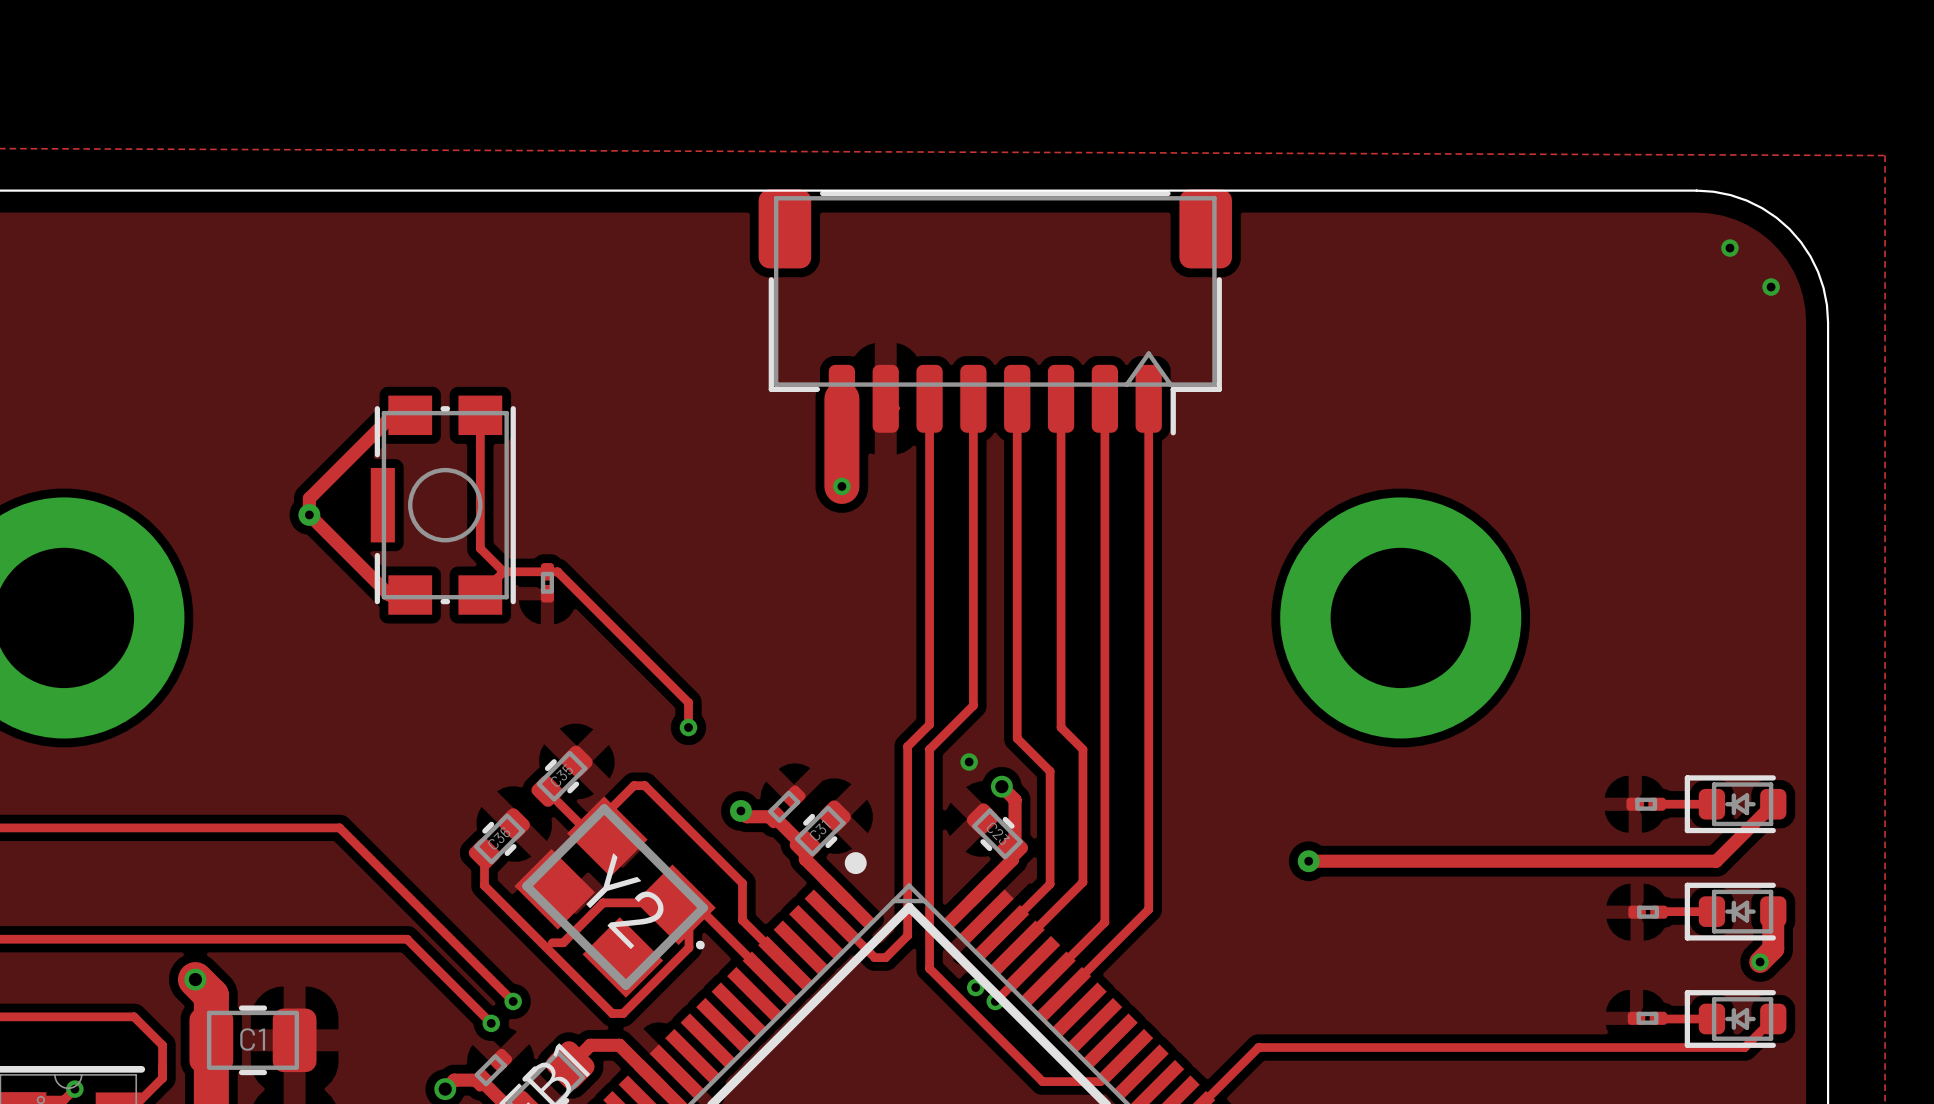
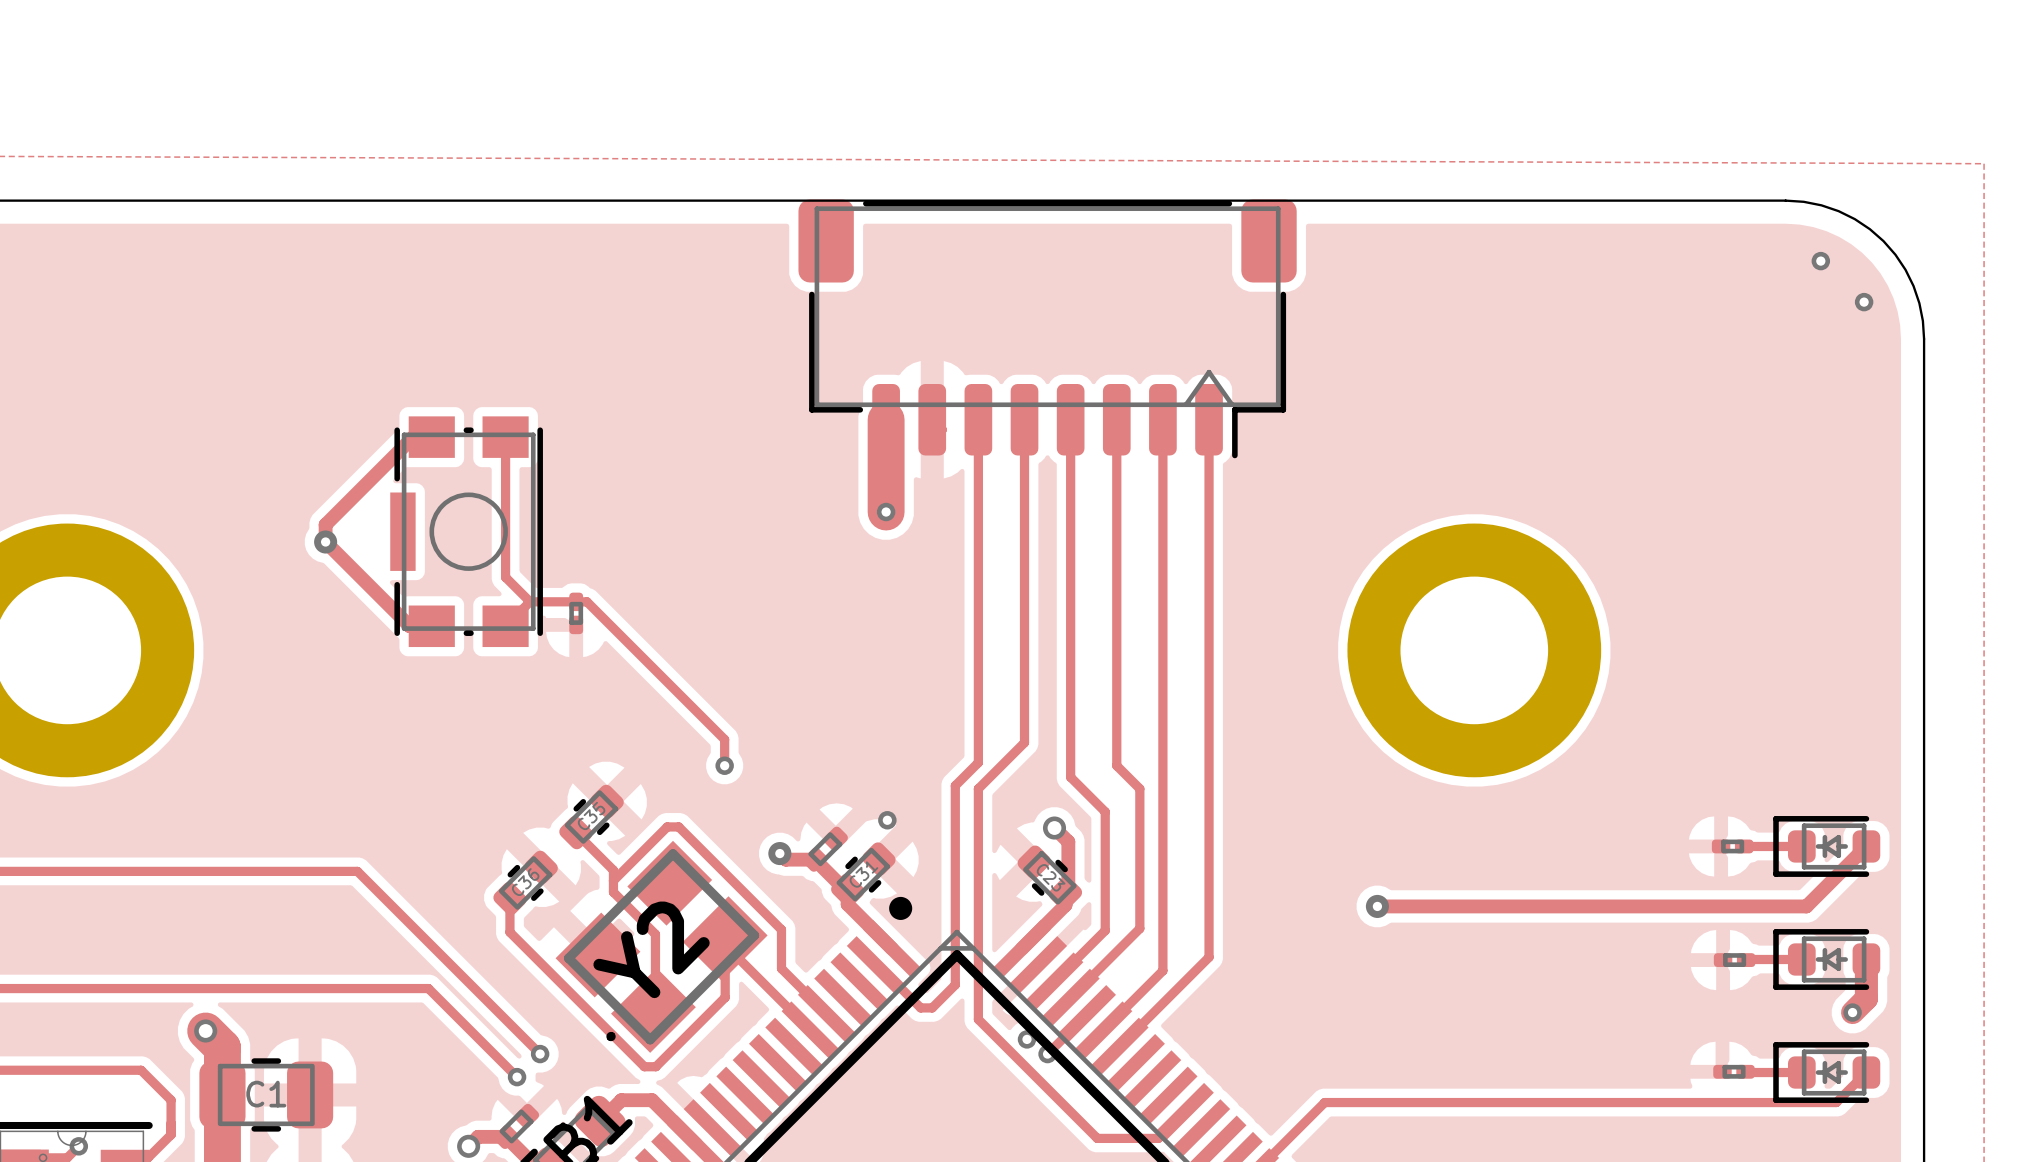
via position: (969, 761) -> (887, 820)
track: none -> (613, 880) (613, 892) (655, 934) (655, 1008) (653, 1010)
Y2 rotation: 0° (615, 897) -> 90° clockwise (661, 946)
track: (675, 904) (673, 902) (603, 902) (563, 942) (552, 942) -> none

